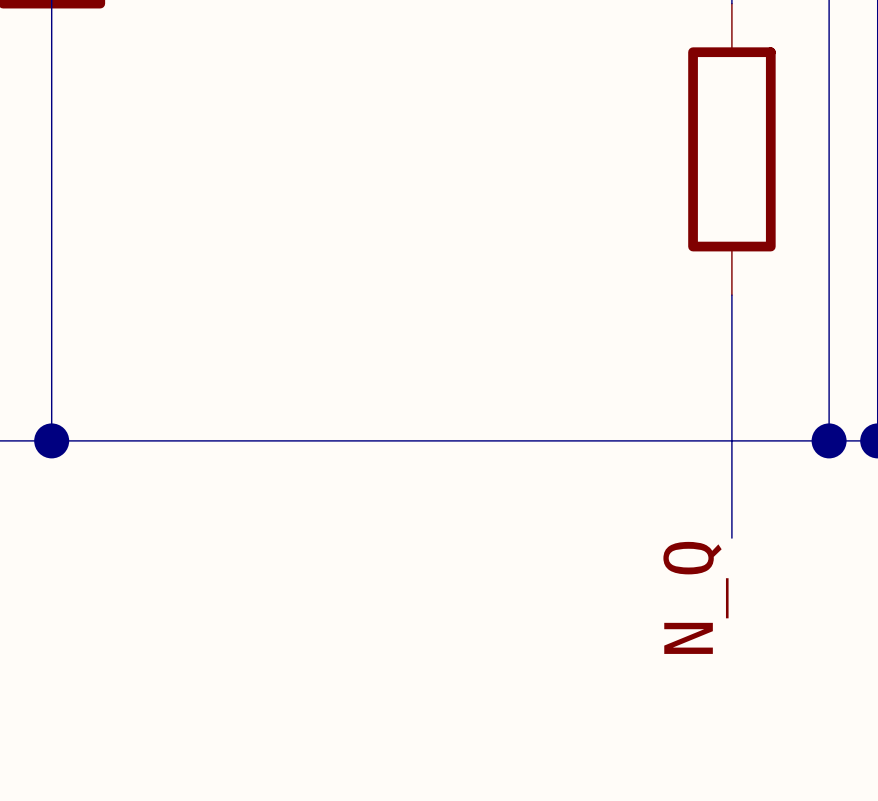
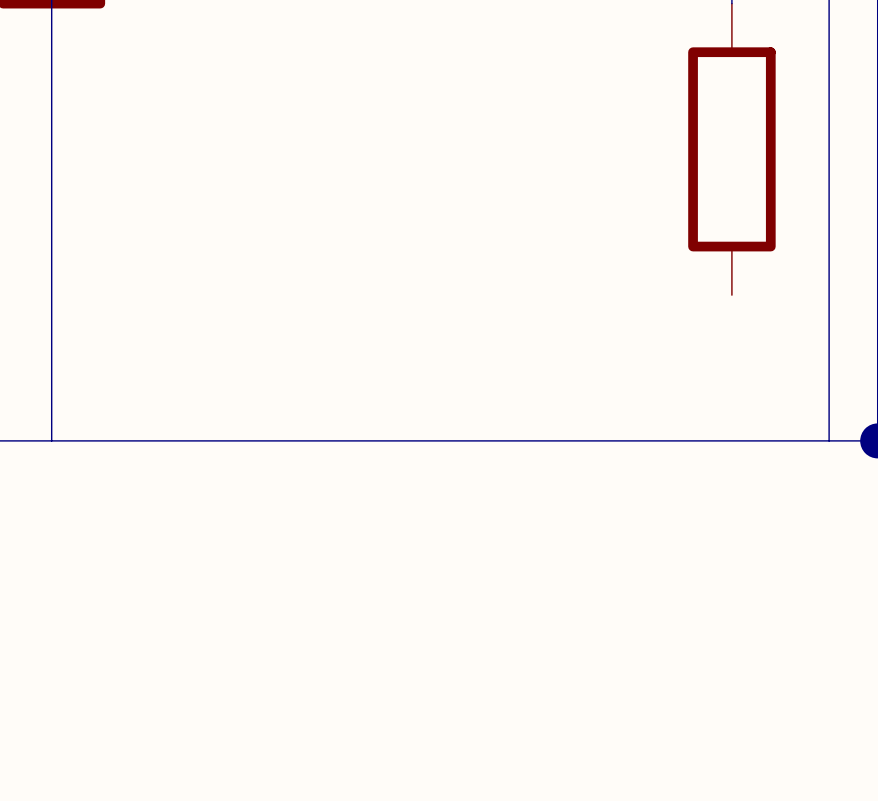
wire: (731, 295) (731, 538) -> none
junction: (51, 440) -> none
junction: (829, 440) -> none
label: N_Q (695, 597) -> none

